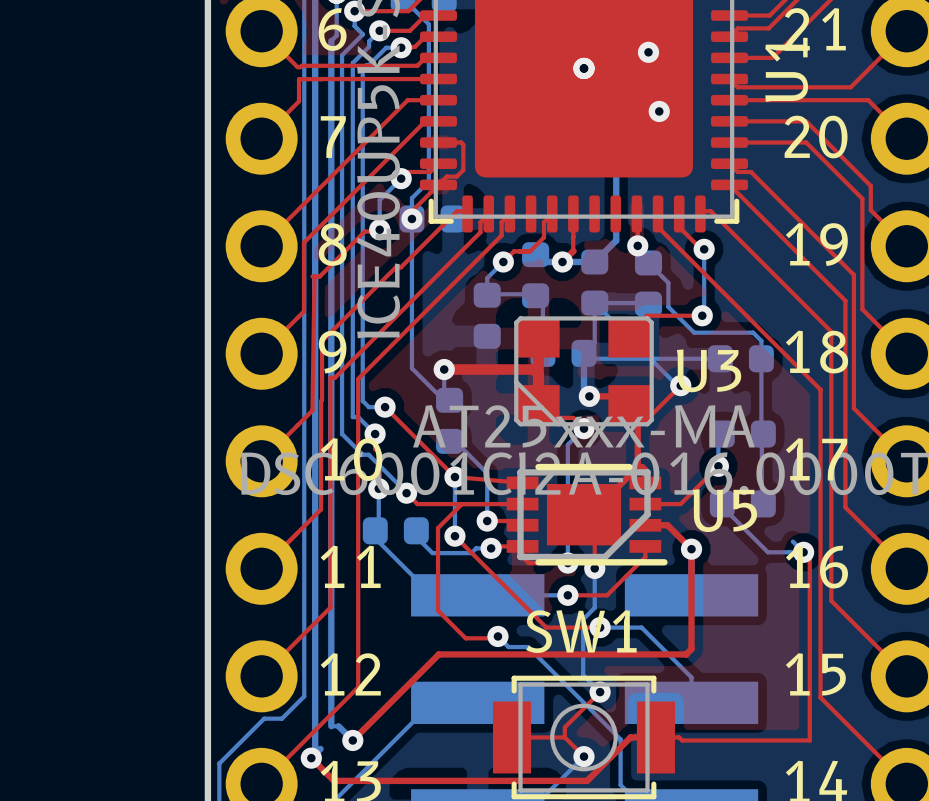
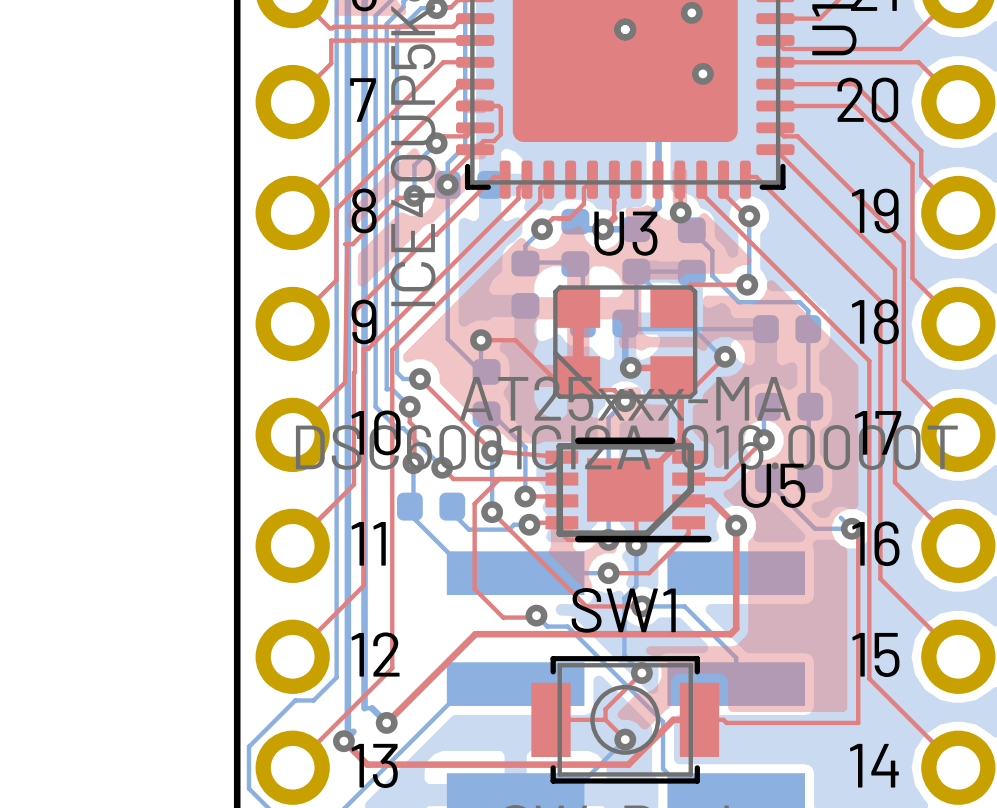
top track width: thick (444, 369) (477, 369) -> thin (481, 340) (515, 340)
top track: (477, 369) (533, 369) (538, 374) -> (515, 340) (565, 390)
U3 name position: U3 (709, 370) -> U3 (625, 233)

